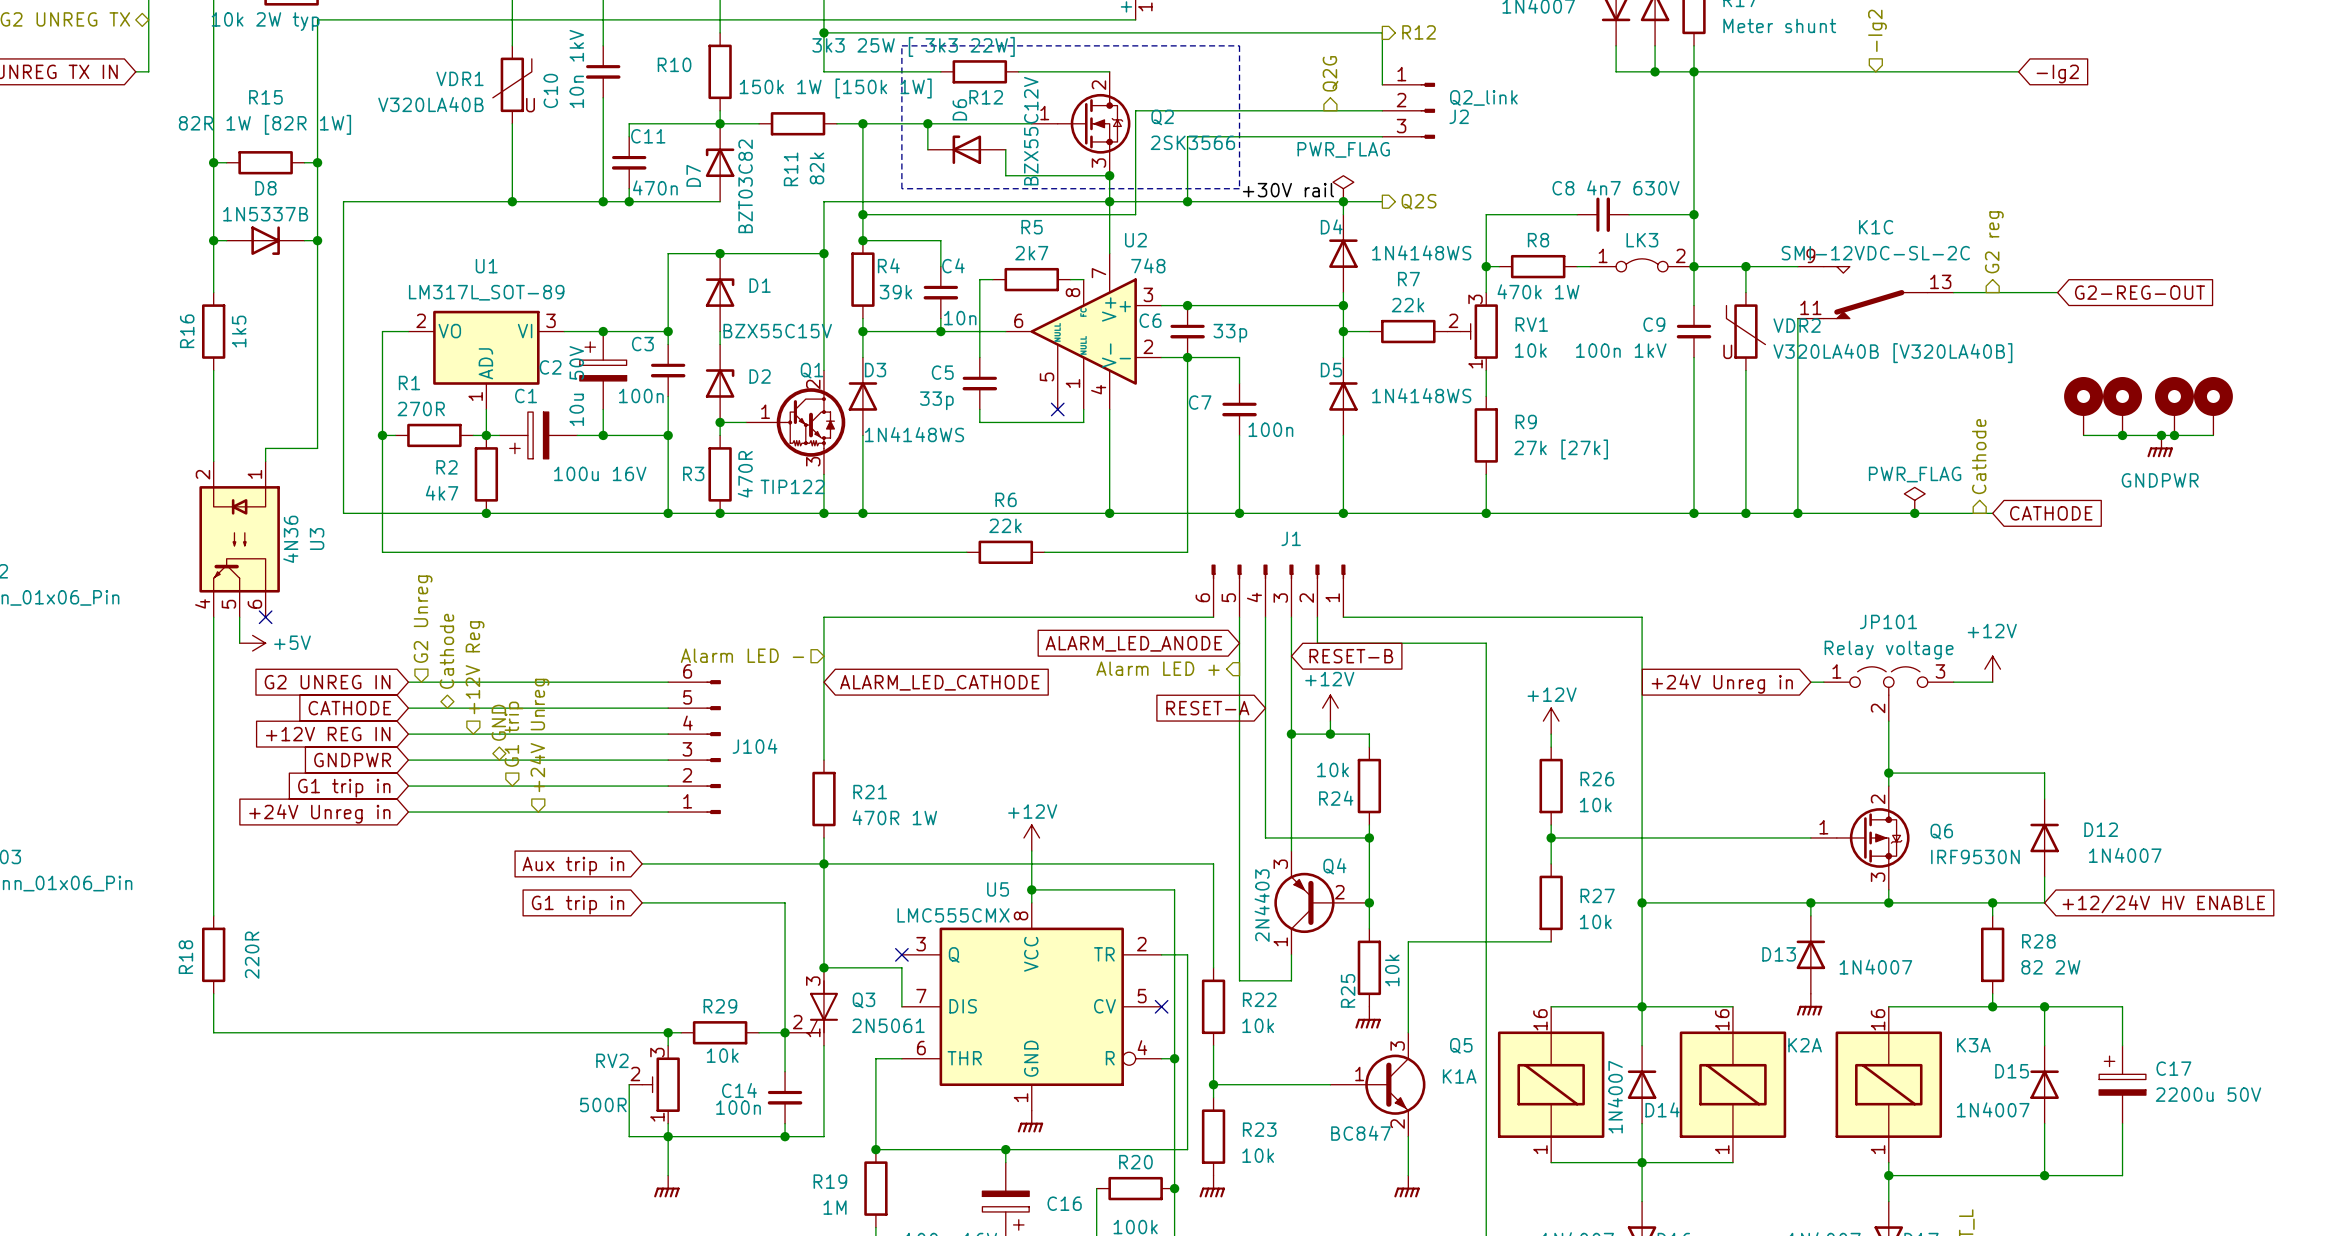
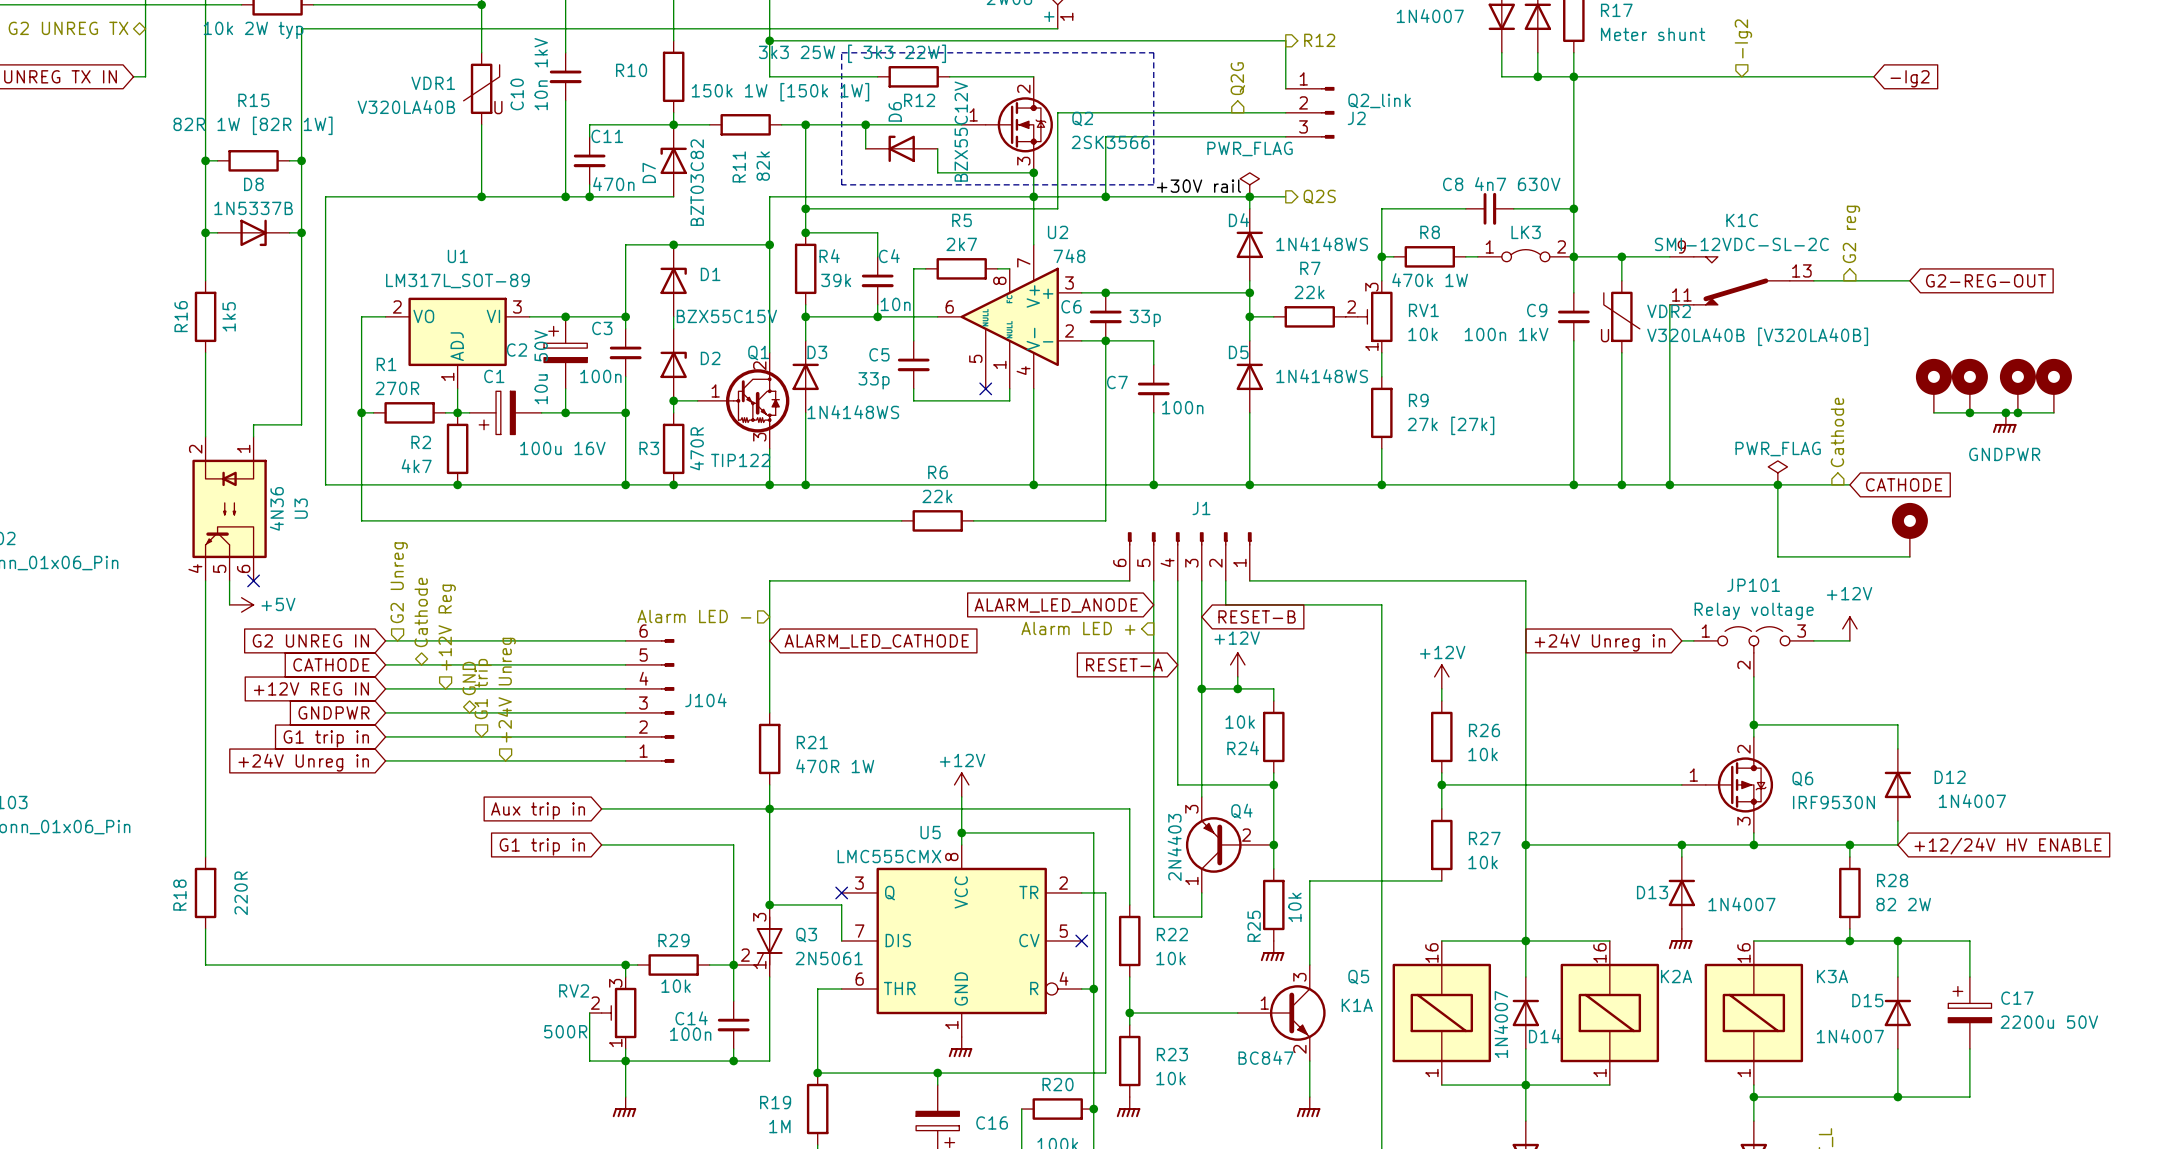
wire: none -> (1777, 484) (1777, 556) (1909, 556)
part: none -> (1909, 529)

